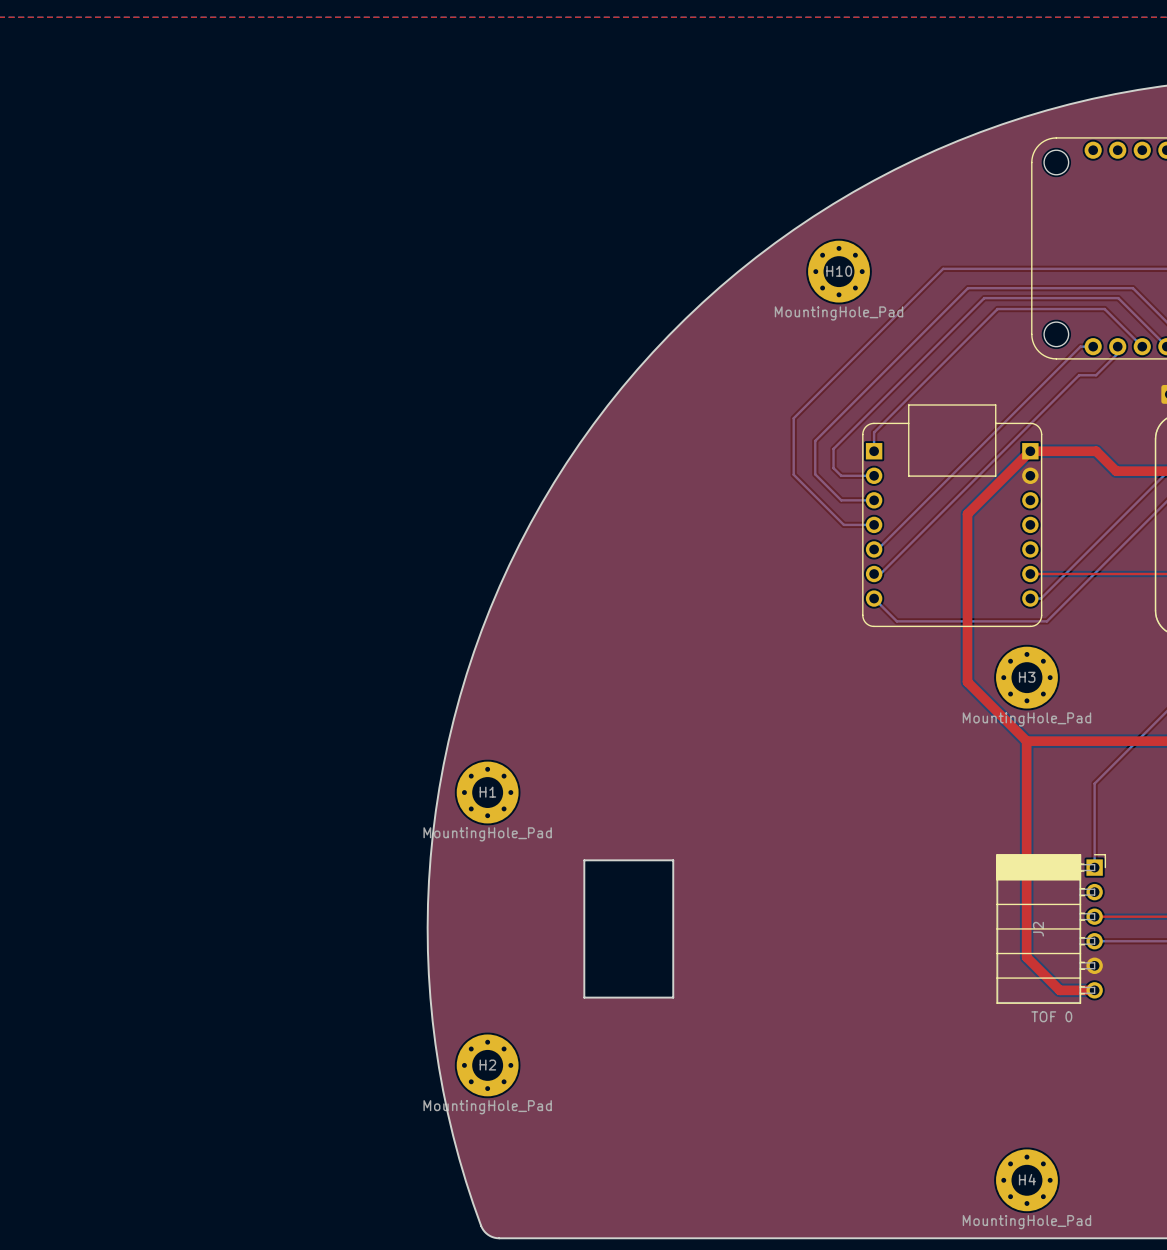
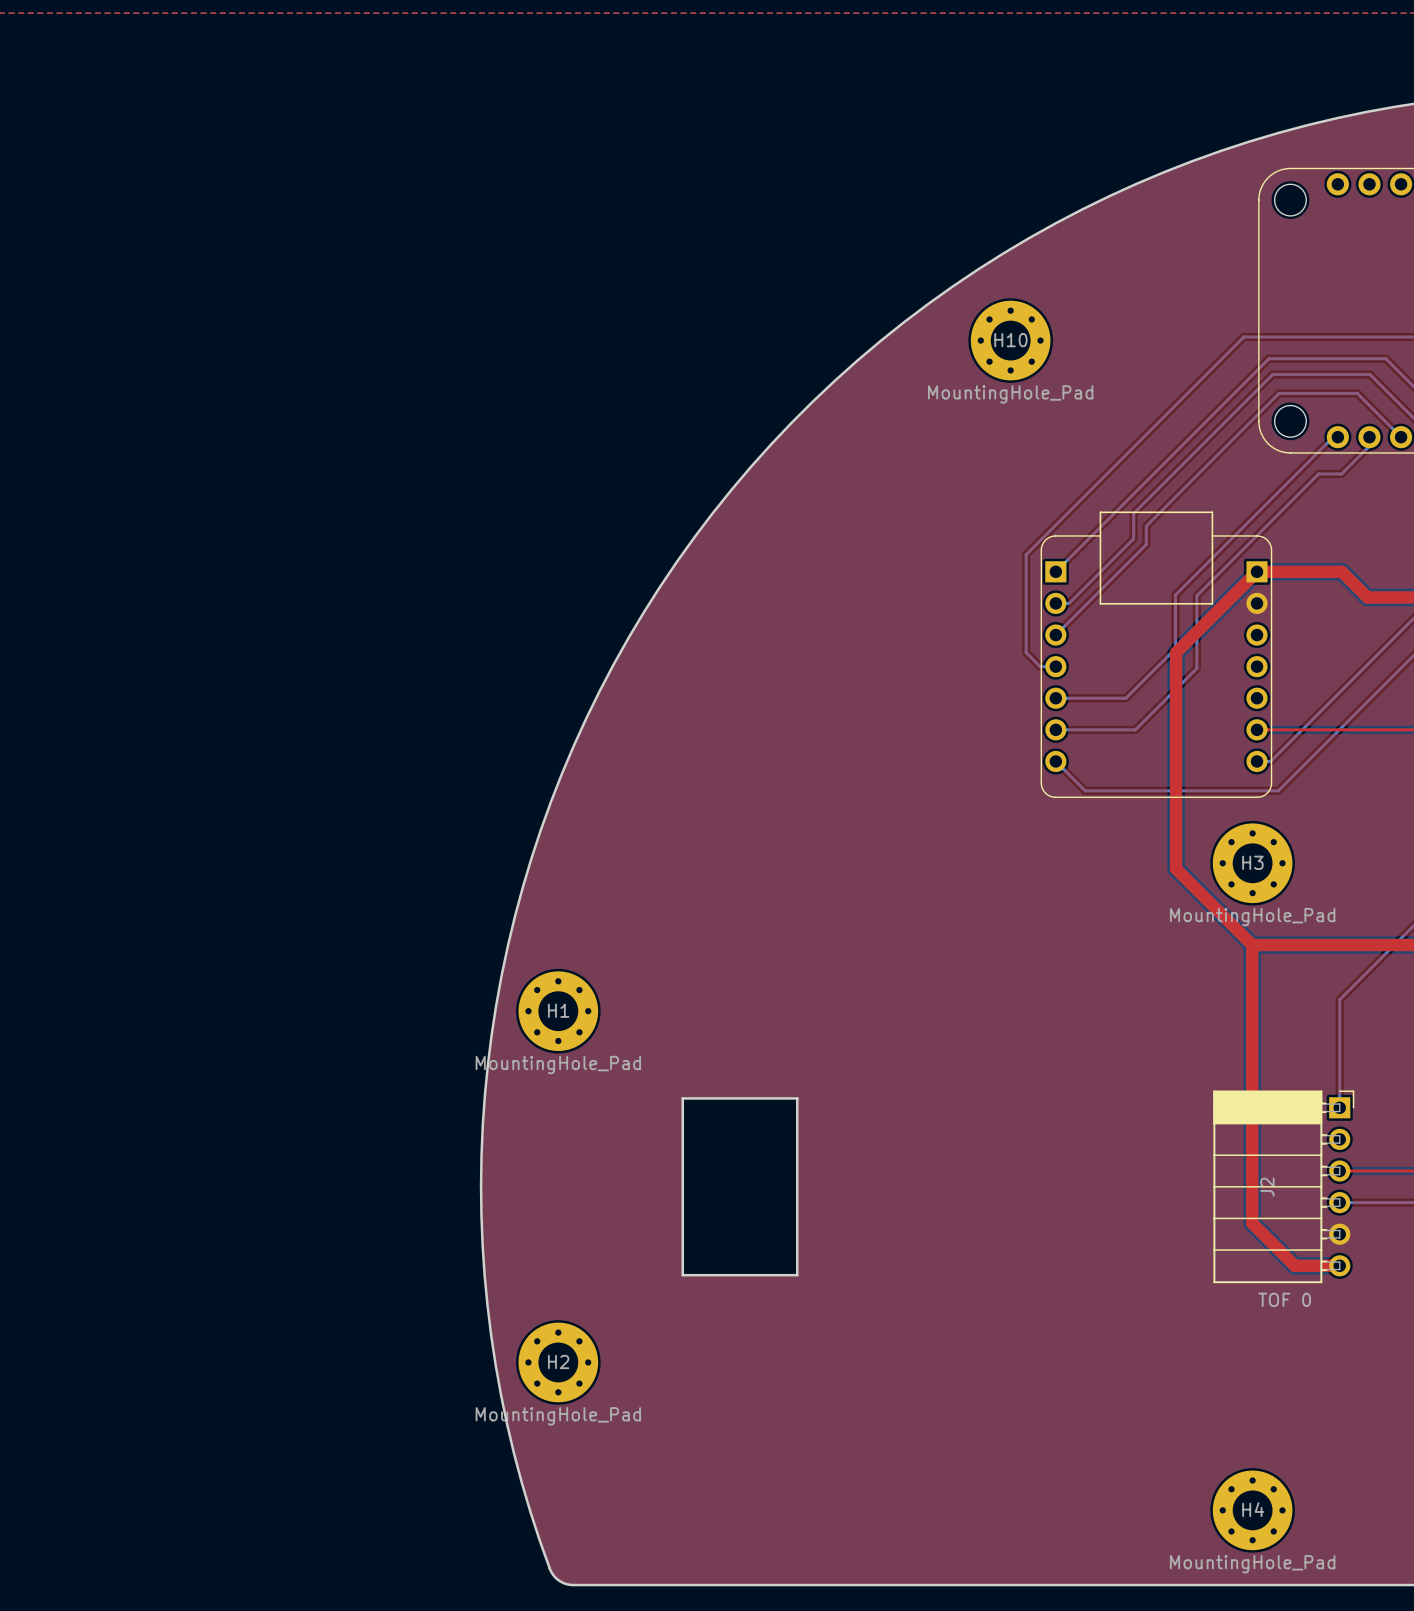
bottom track: (1020, 268) (943, 268) (793, 418) (793, 474) (843, 524) (861, 524) -> (1243, 336) (1026, 554) (1026, 652) (1040, 666)
bottom track: (1132, 288) (968, 288) (815, 440) (815, 474) (841, 500) (874, 500) -> (1357, 393) (1279, 393) (1146, 526) (1146, 544) (1055, 635)
bottom track: (1118, 298) (984, 298) (833, 448) (833, 468) (841, 475) (874, 475) -> (1370, 374) (1272, 374) (1133, 513) (1133, 538) (1069, 603) (1055, 603)
bottom track: (1108, 312) (1104, 309) (997, 309) (874, 432) (874, 451) -> (1389, 361) (1385, 358) (1269, 358) (1055, 571)
bottom track: (1089, 346) (1080, 346) (877, 549) -> (1333, 437) (1175, 595) (1175, 648) (1125, 698) (1060, 698)
bottom track: (1079, 375) (880, 574) -> (1319, 474) (1196, 595) (1196, 668) (1135, 729) (1063, 729)

